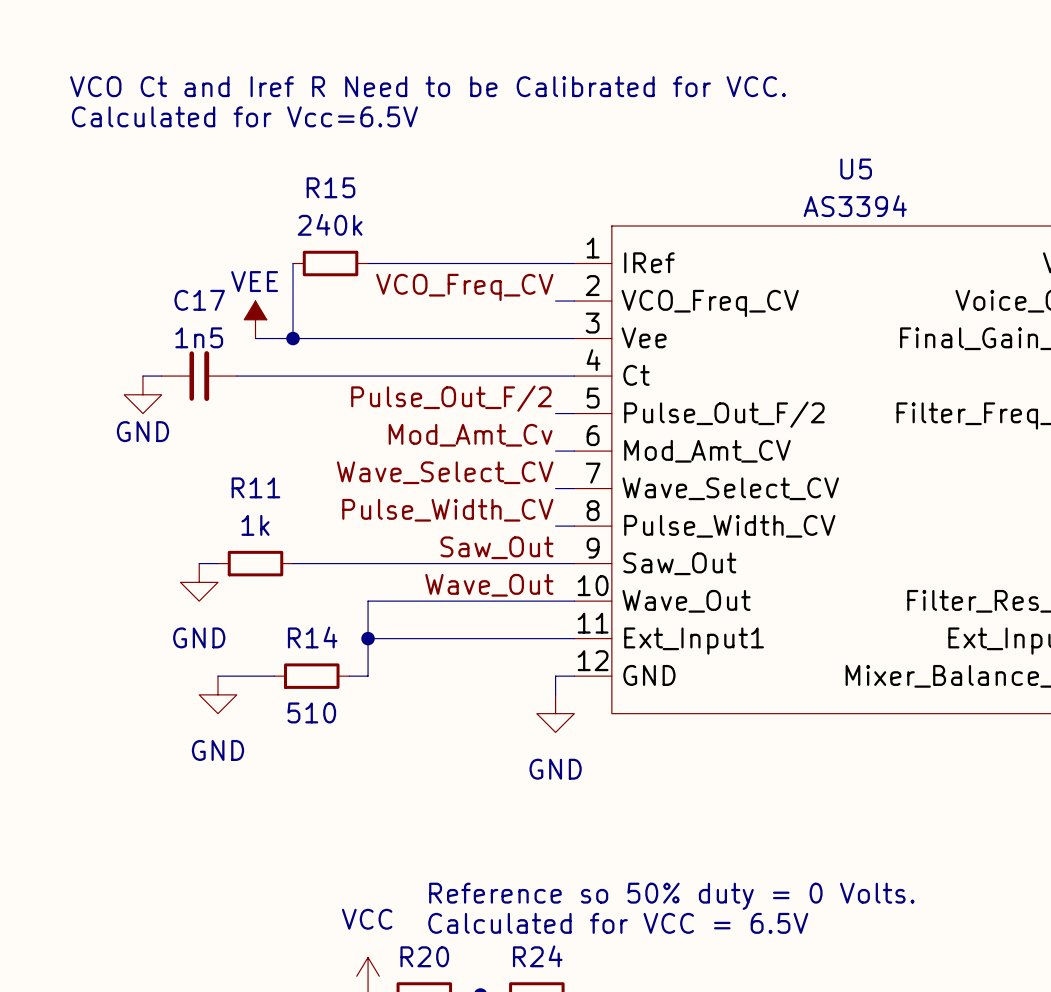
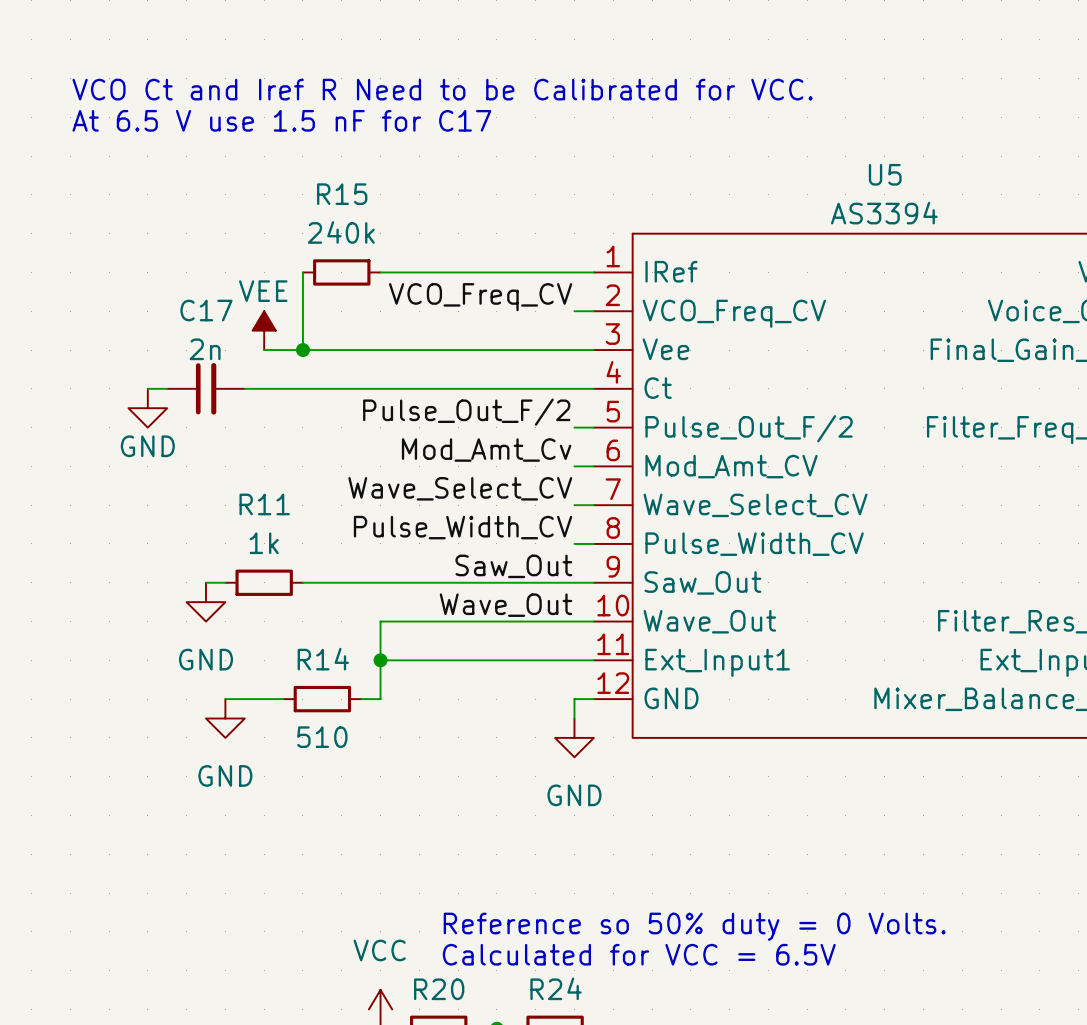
text: Calculated for Vcc=6.5V (244, 116) -> At 6.5 V use 1.5 nF for C17 (281, 120)
C17 value: 1n5 (199, 337) -> 2n (205, 349)

